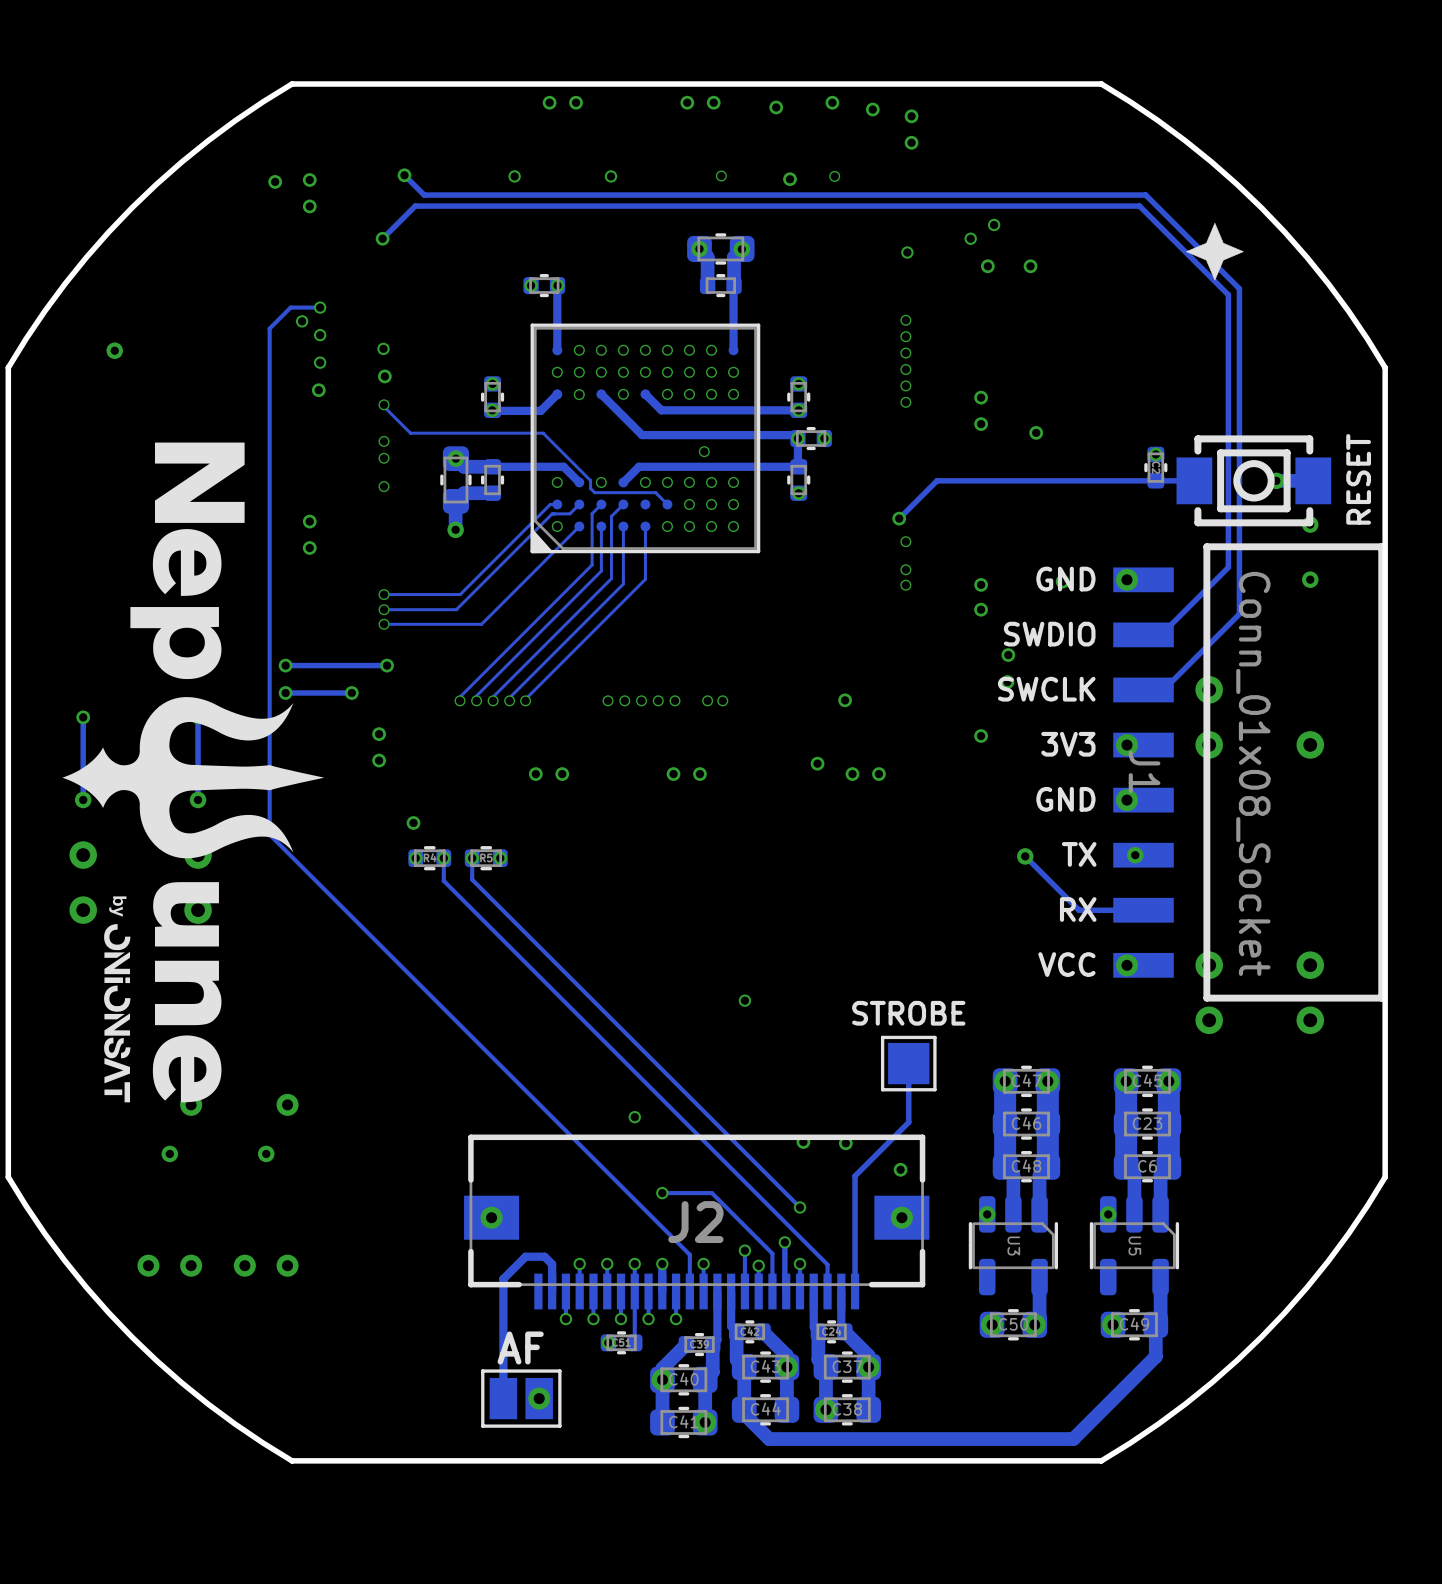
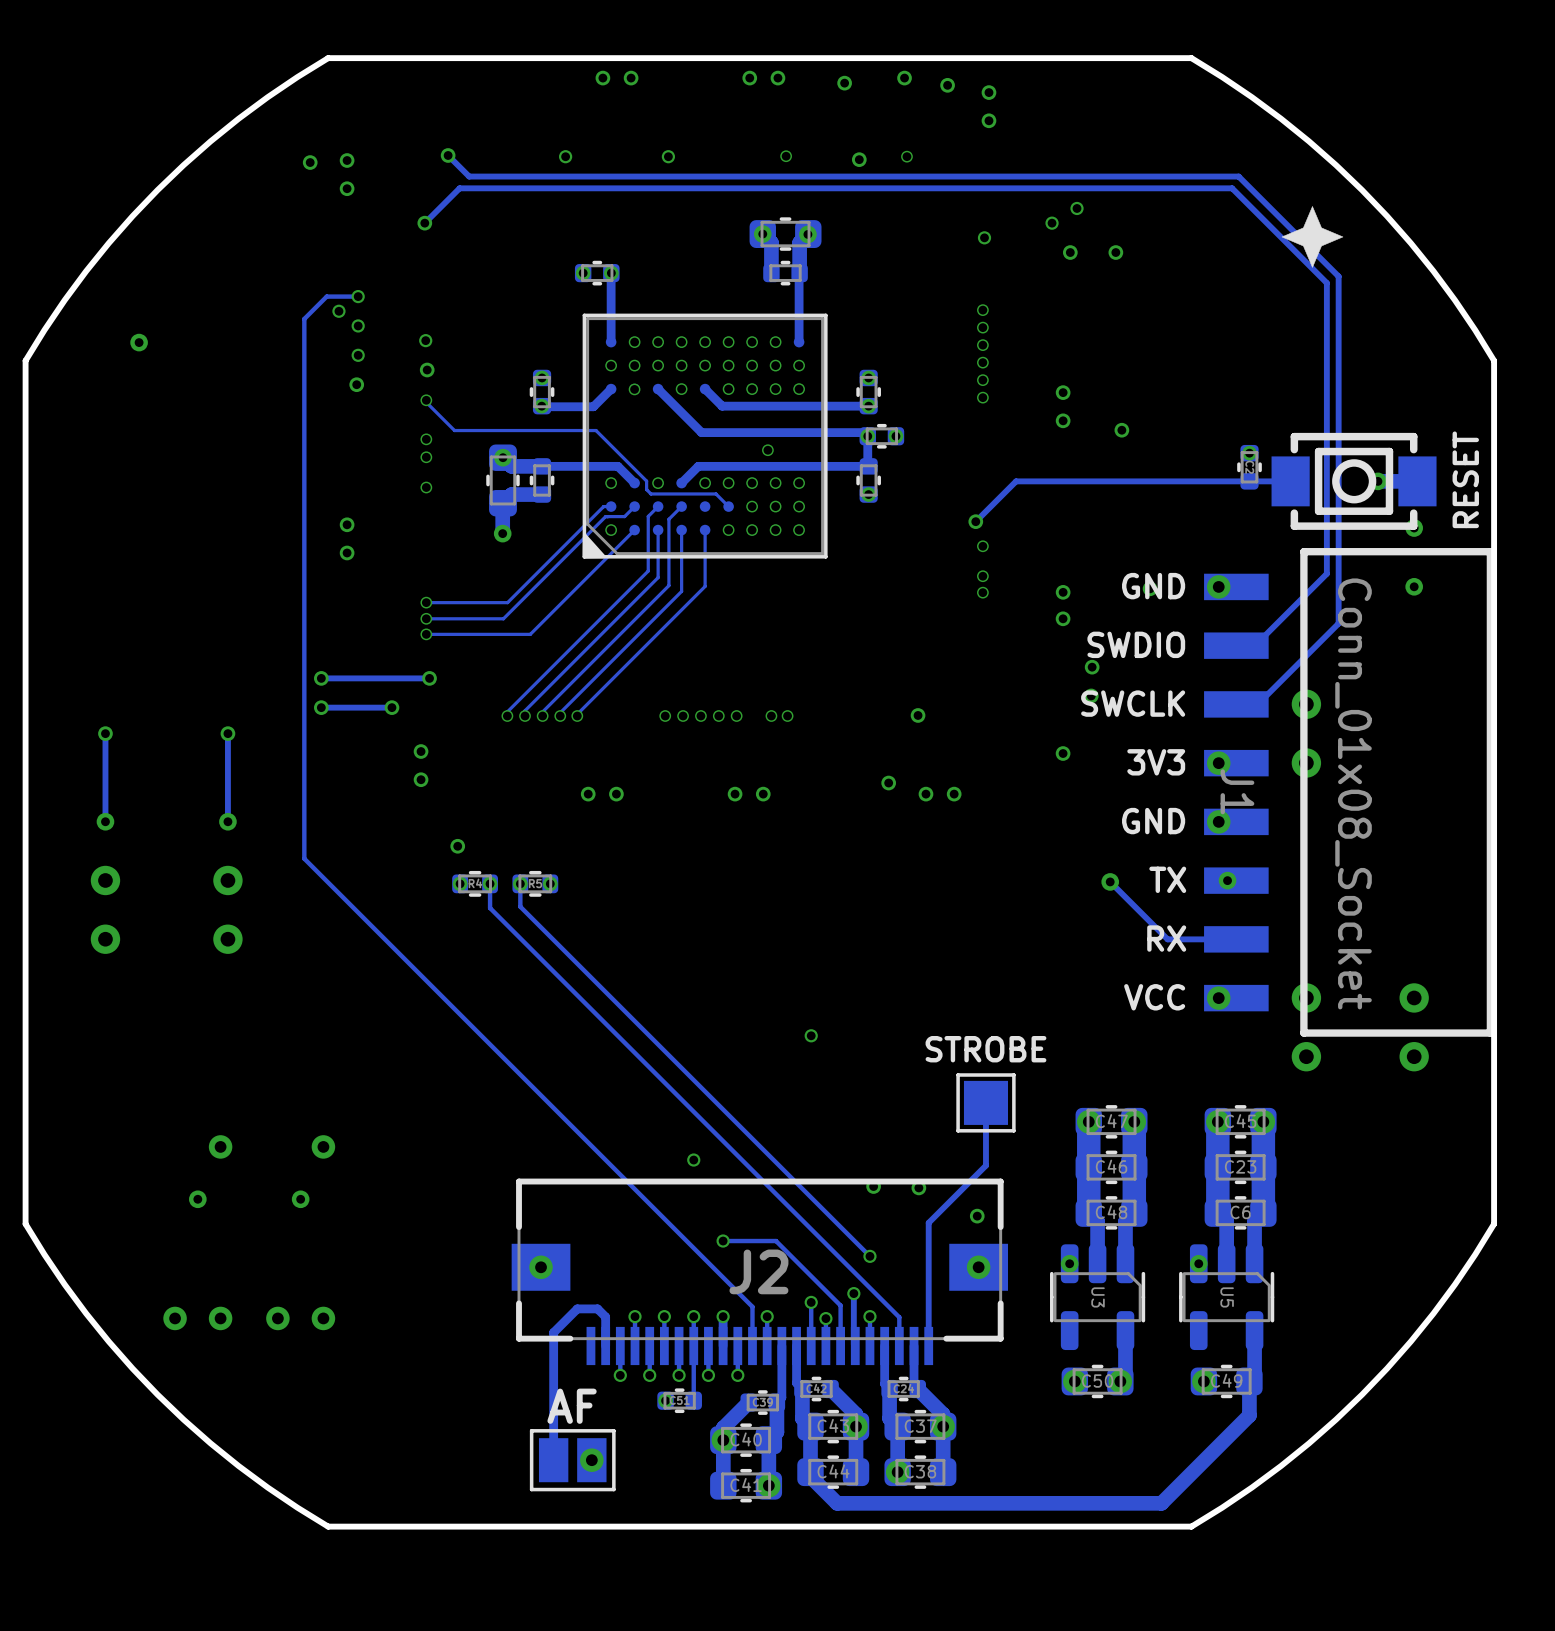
drawing: [62, 442, 325, 1103] -> none
via: (1310, 744) -> none

